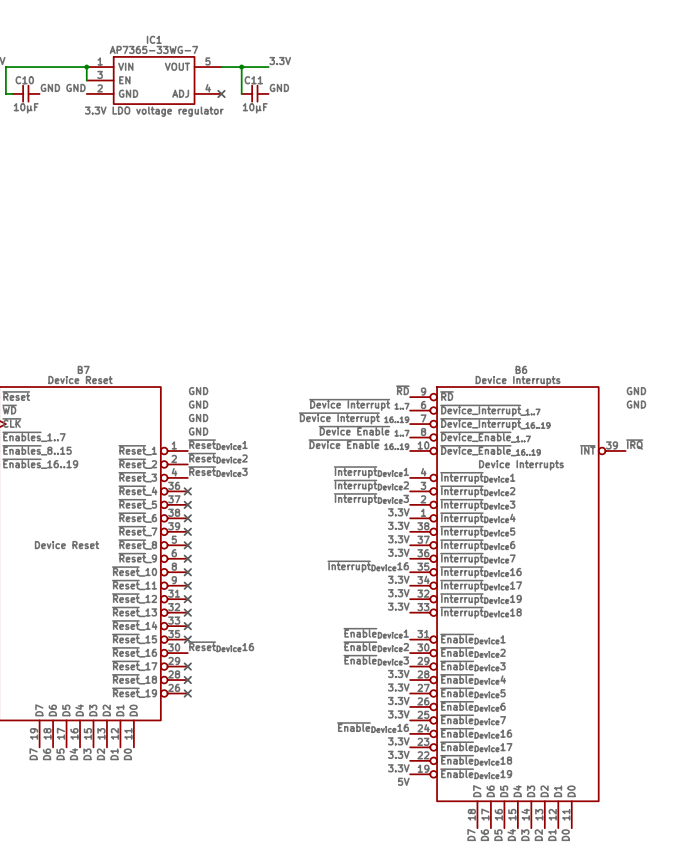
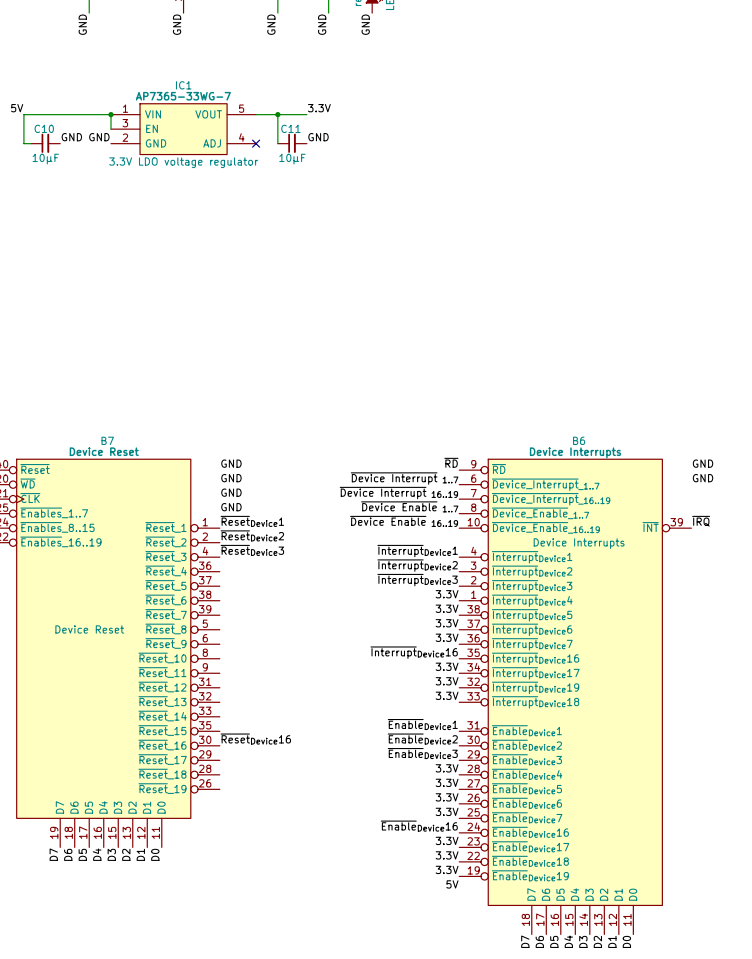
no-connect mark: (187, 491) -> none
no-connect mark: (187, 504) -> none
no-connect mark: (187, 518) -> none
no-connect mark: (187, 531) -> none
no-connect mark: (187, 545) -> none
no-connect mark: (187, 558) -> none
no-connect mark: (187, 572) -> none
no-connect mark: (187, 585) -> none
no-connect mark: (187, 599) -> none
no-connect mark: (187, 612) -> none
no-connect mark: (187, 626) -> none
no-connect mark: (187, 639) -> none
no-connect mark: (187, 666) -> none
no-connect mark: (187, 680) -> none
no-connect mark: (187, 693) -> none

